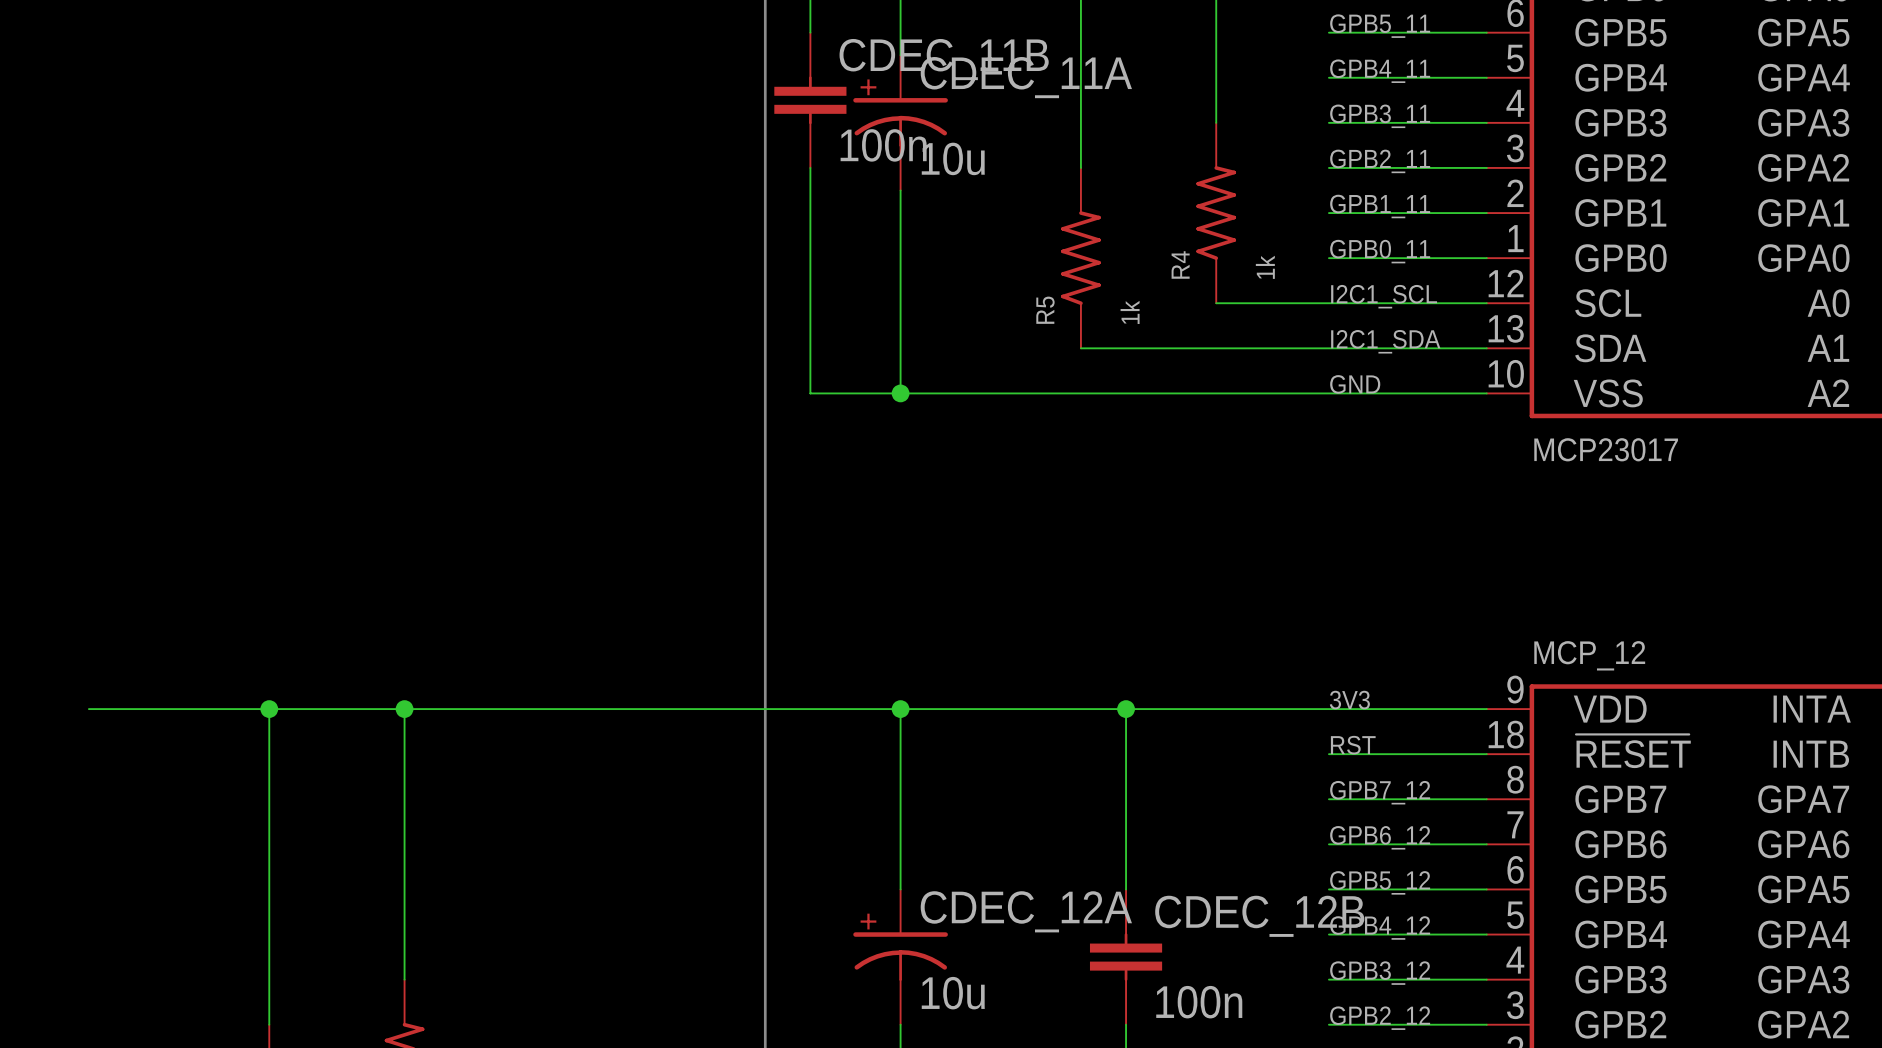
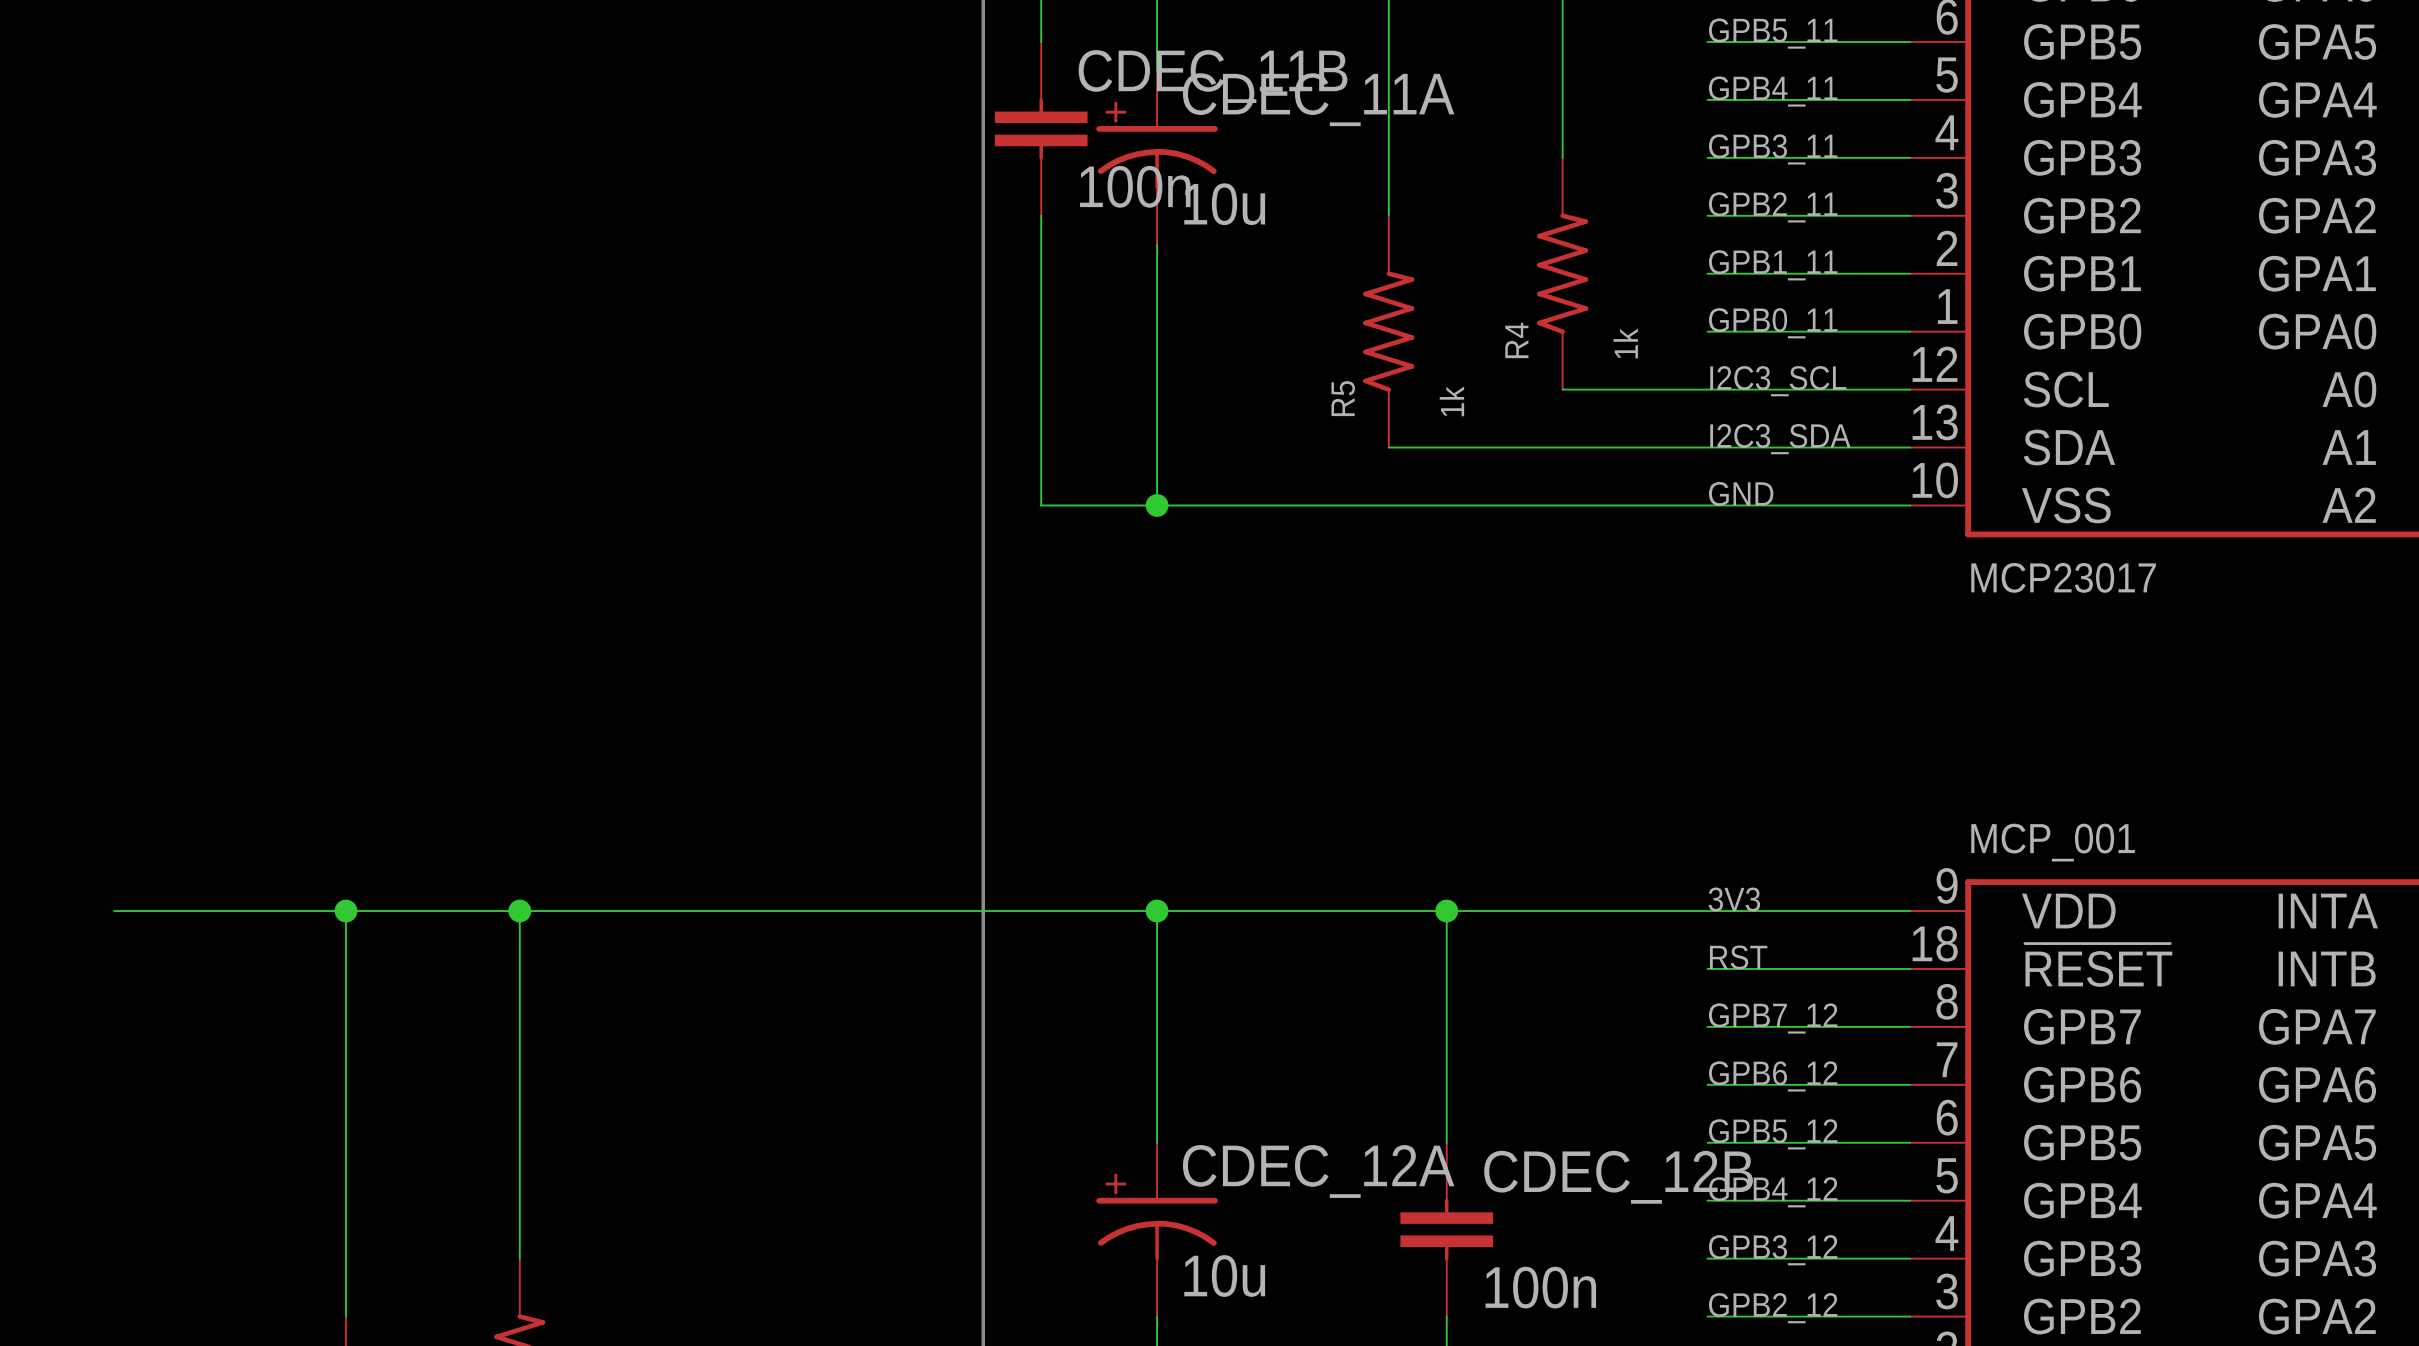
label: I2C1_SCL (1384, 296) -> I2C3_SCL (1778, 381)
label: I2C1_SDA (1385, 341) -> I2C3_SDA (1780, 439)
MCP_12 name: MCP_12 (1589, 655) -> MCP_001 (2053, 842)

